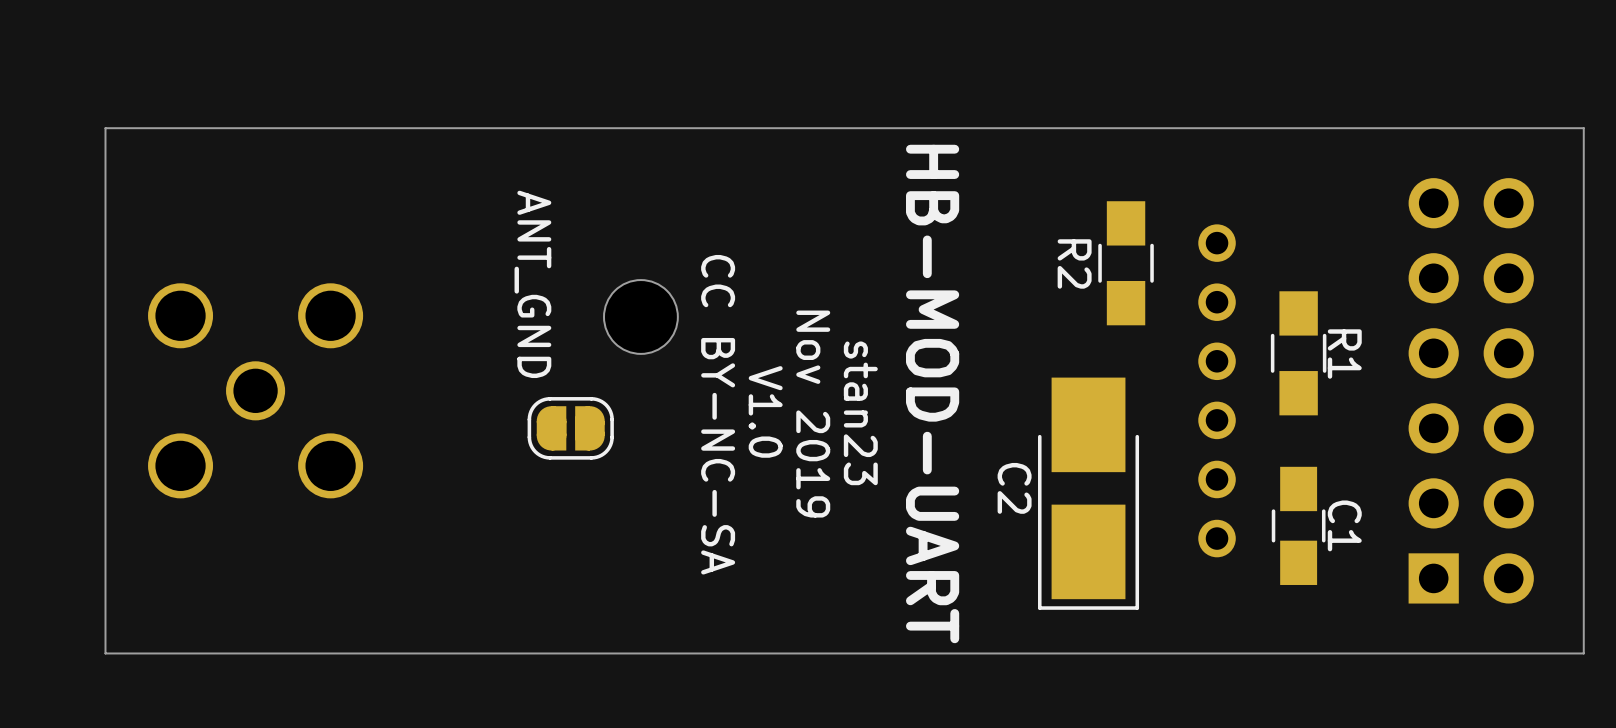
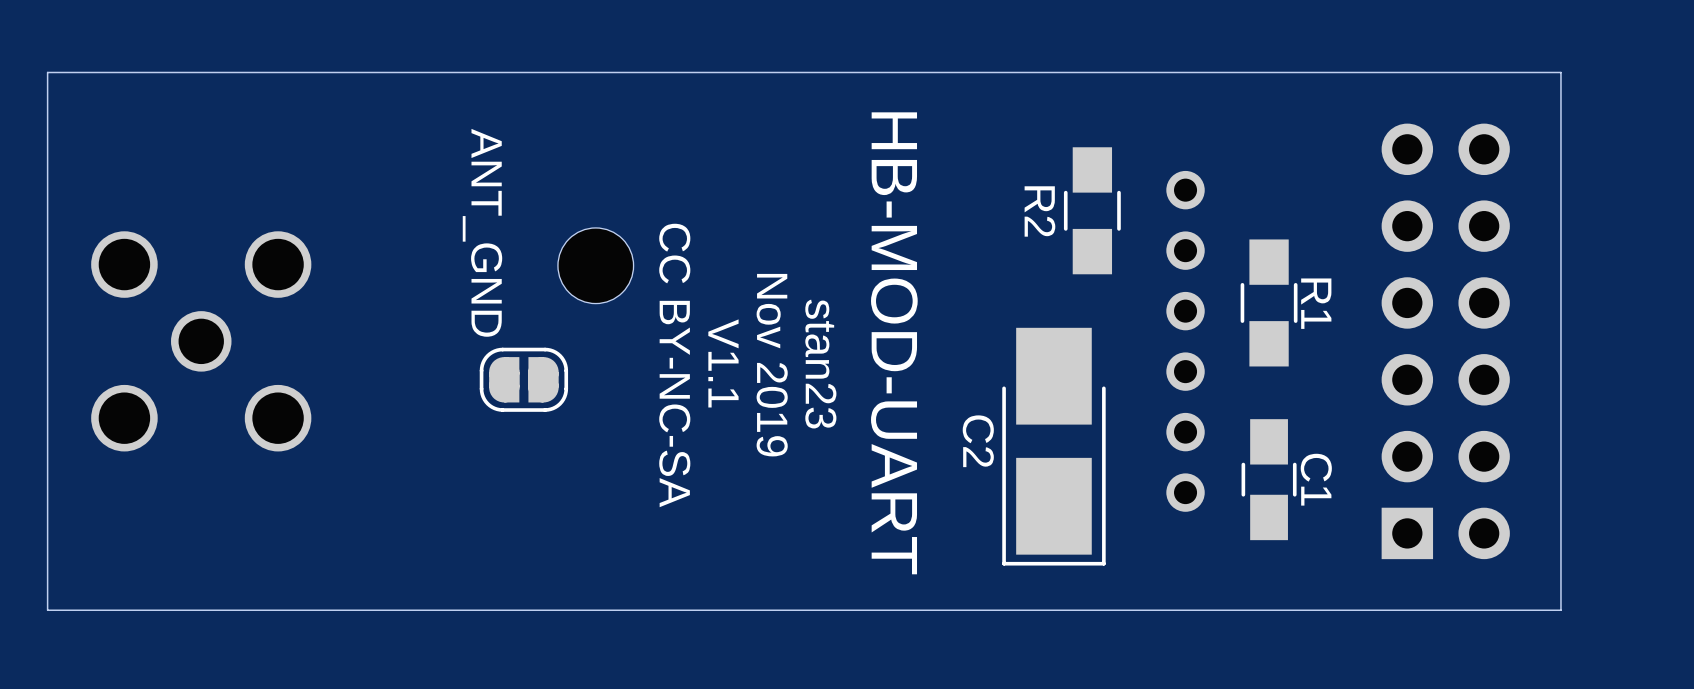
text: V1.0 (765, 411) -> V1.1 (723, 363)

